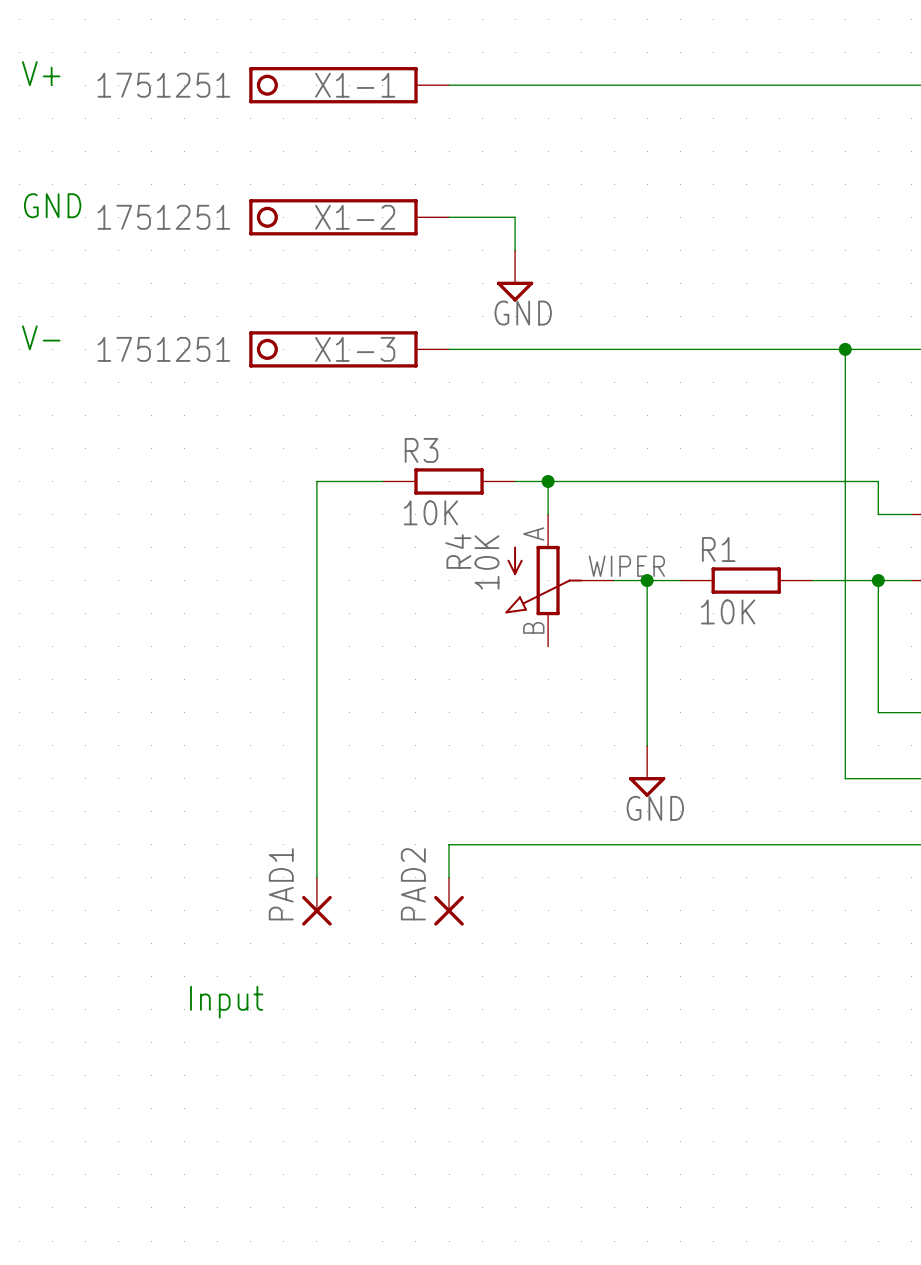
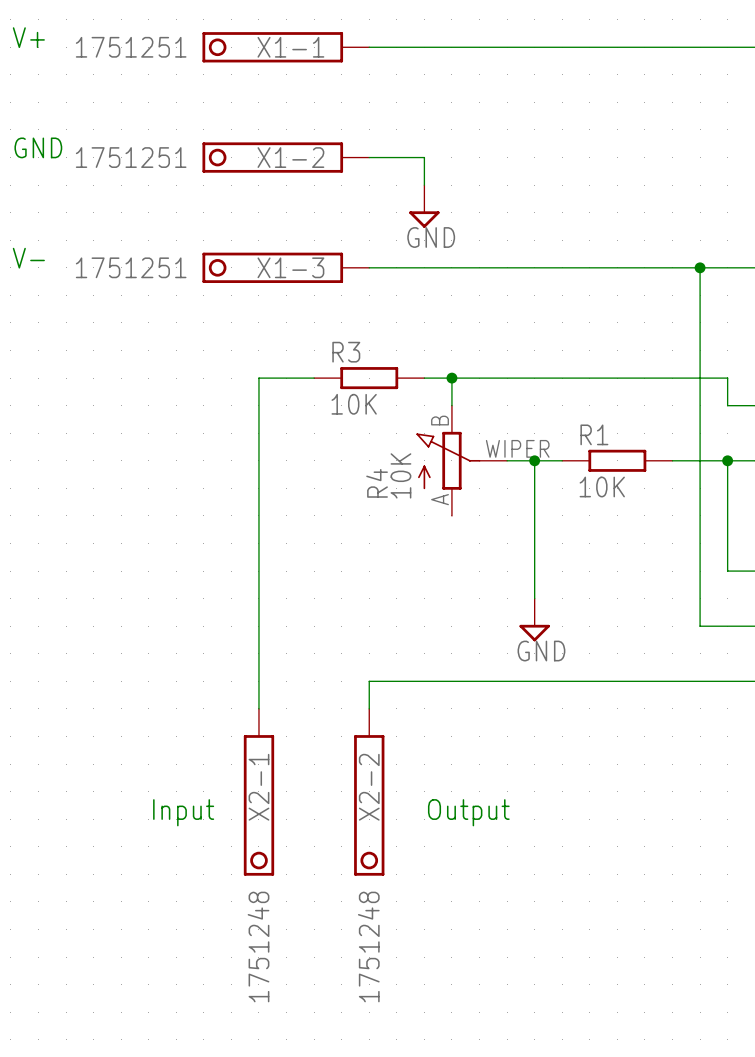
R4 flip: as is (543, 580) -> up-down (448, 460)
PAD1: (316, 901) -> none
PAD2: (449, 901) -> none
X2-1: none -> 1751248 (258, 792)
X2-2: none -> 1751248 (369, 792)
text: none -> Output (468, 812)

